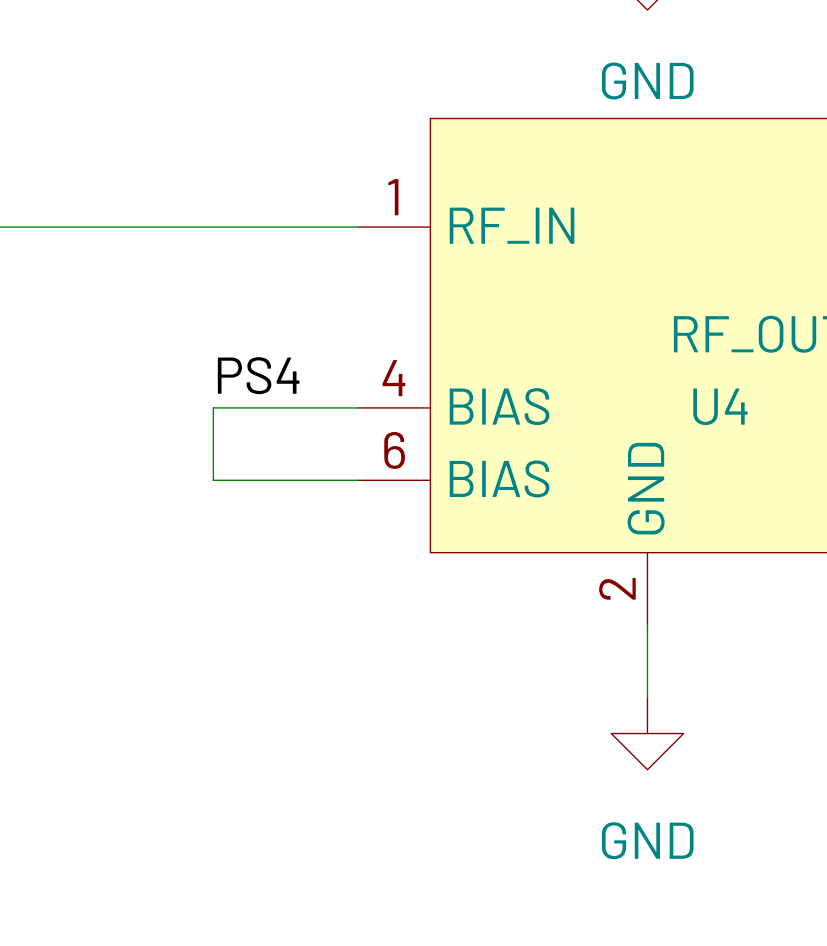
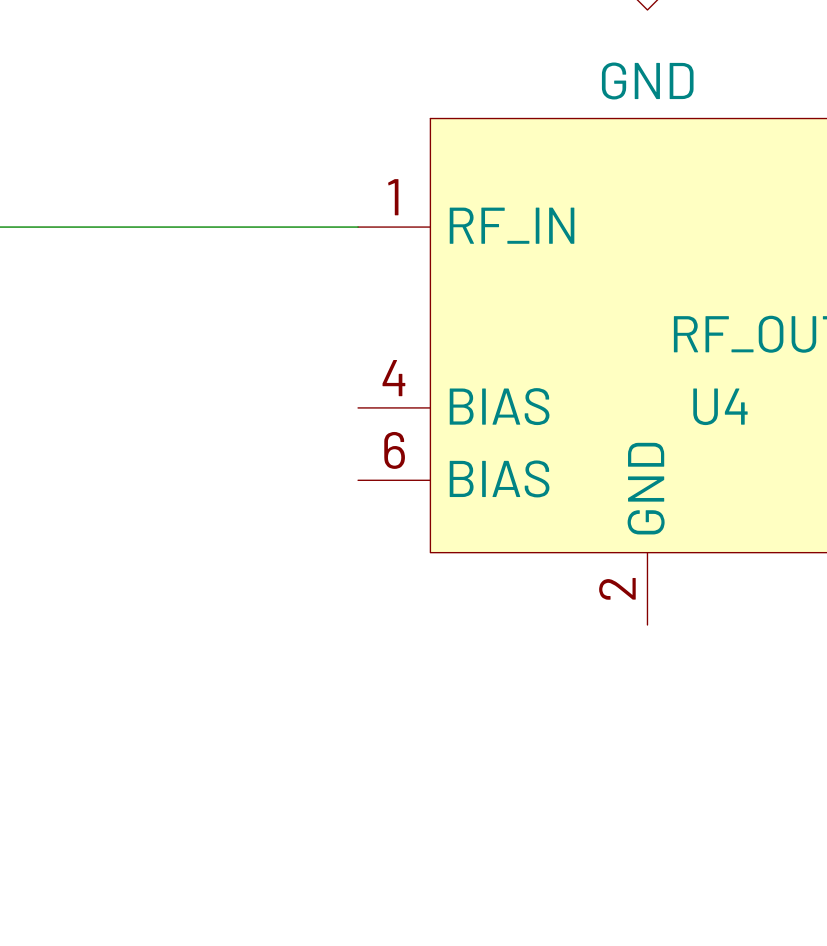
label: PS4 (258, 375) -> none
wire: (358, 407) (213, 407) (213, 480) (358, 480) -> none
wire: (647, 625) (647, 697) -> none
power symbol: GND (647, 733) -> none

